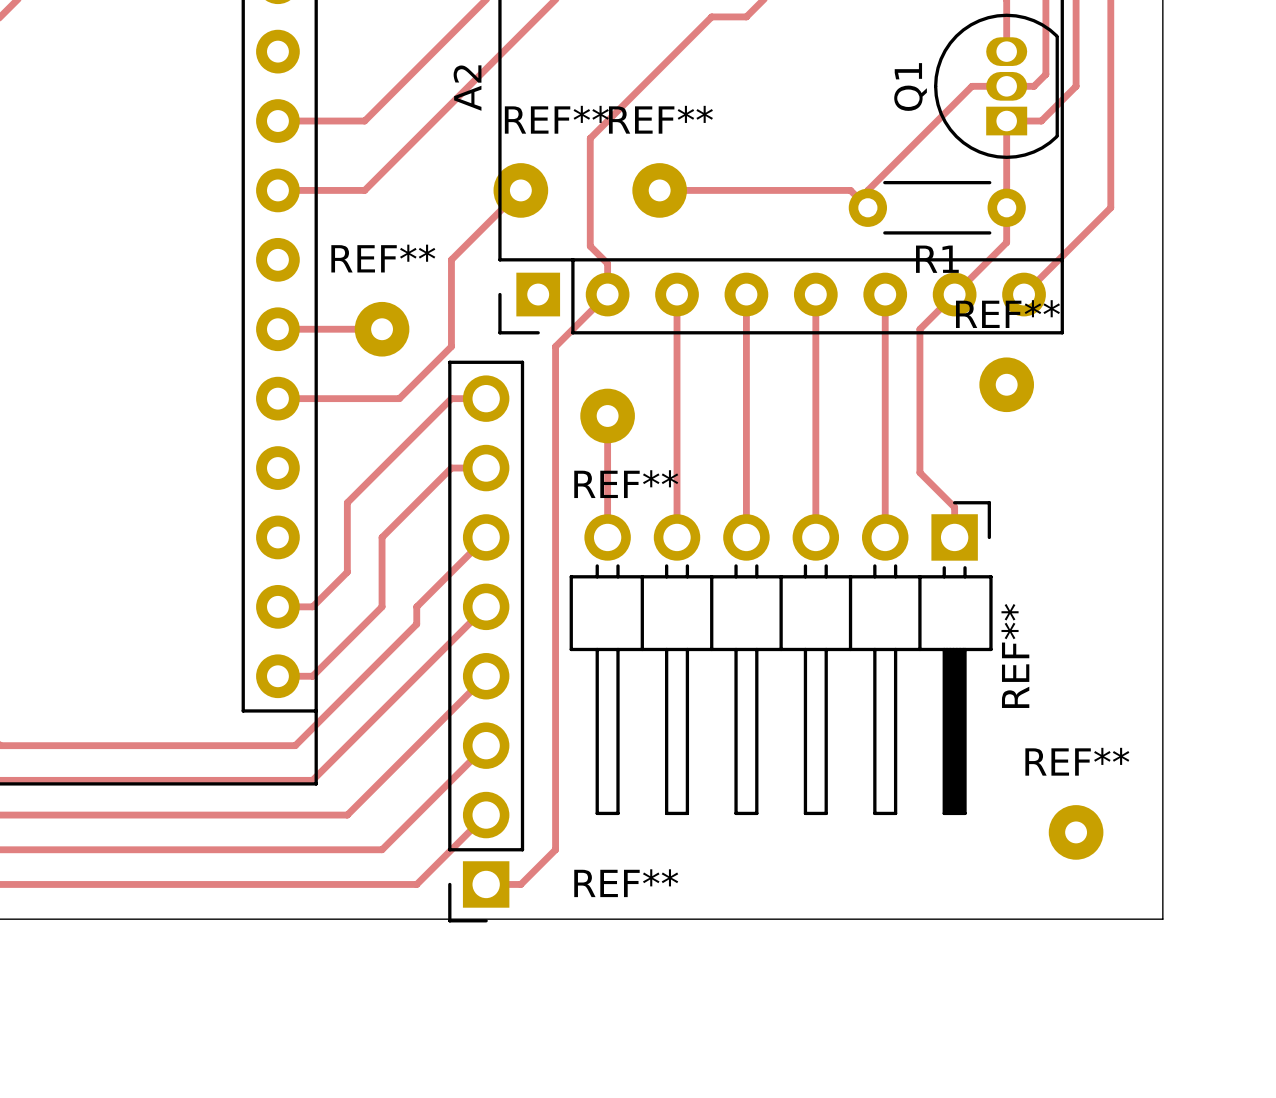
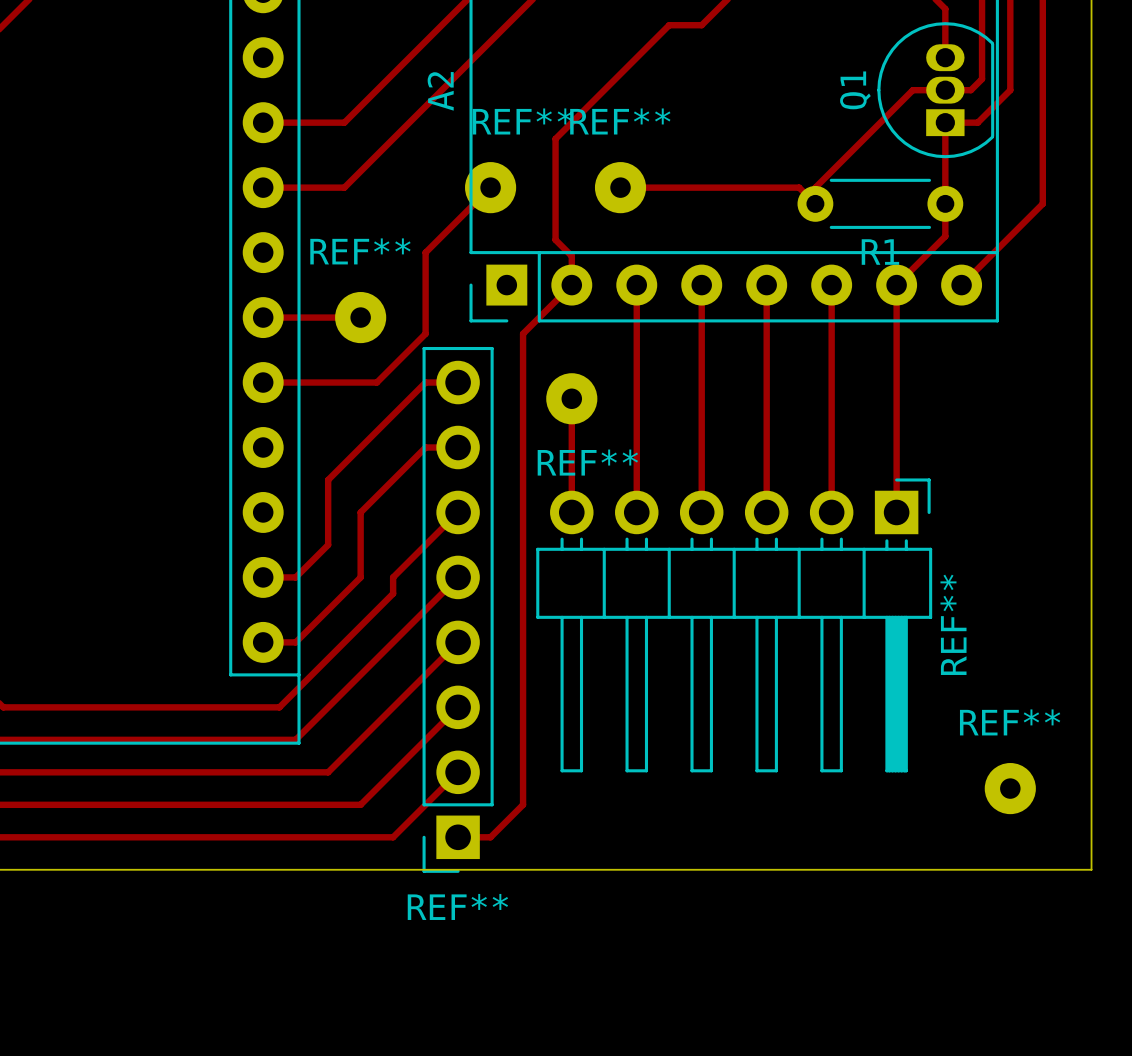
track: (954, 294) (919, 329) (919, 472) (954, 507) -> (896, 285) (896, 484)
REF**: (1006, 384) -> none
REF** name position: REF** (626, 883) -> REF** (457, 906)

